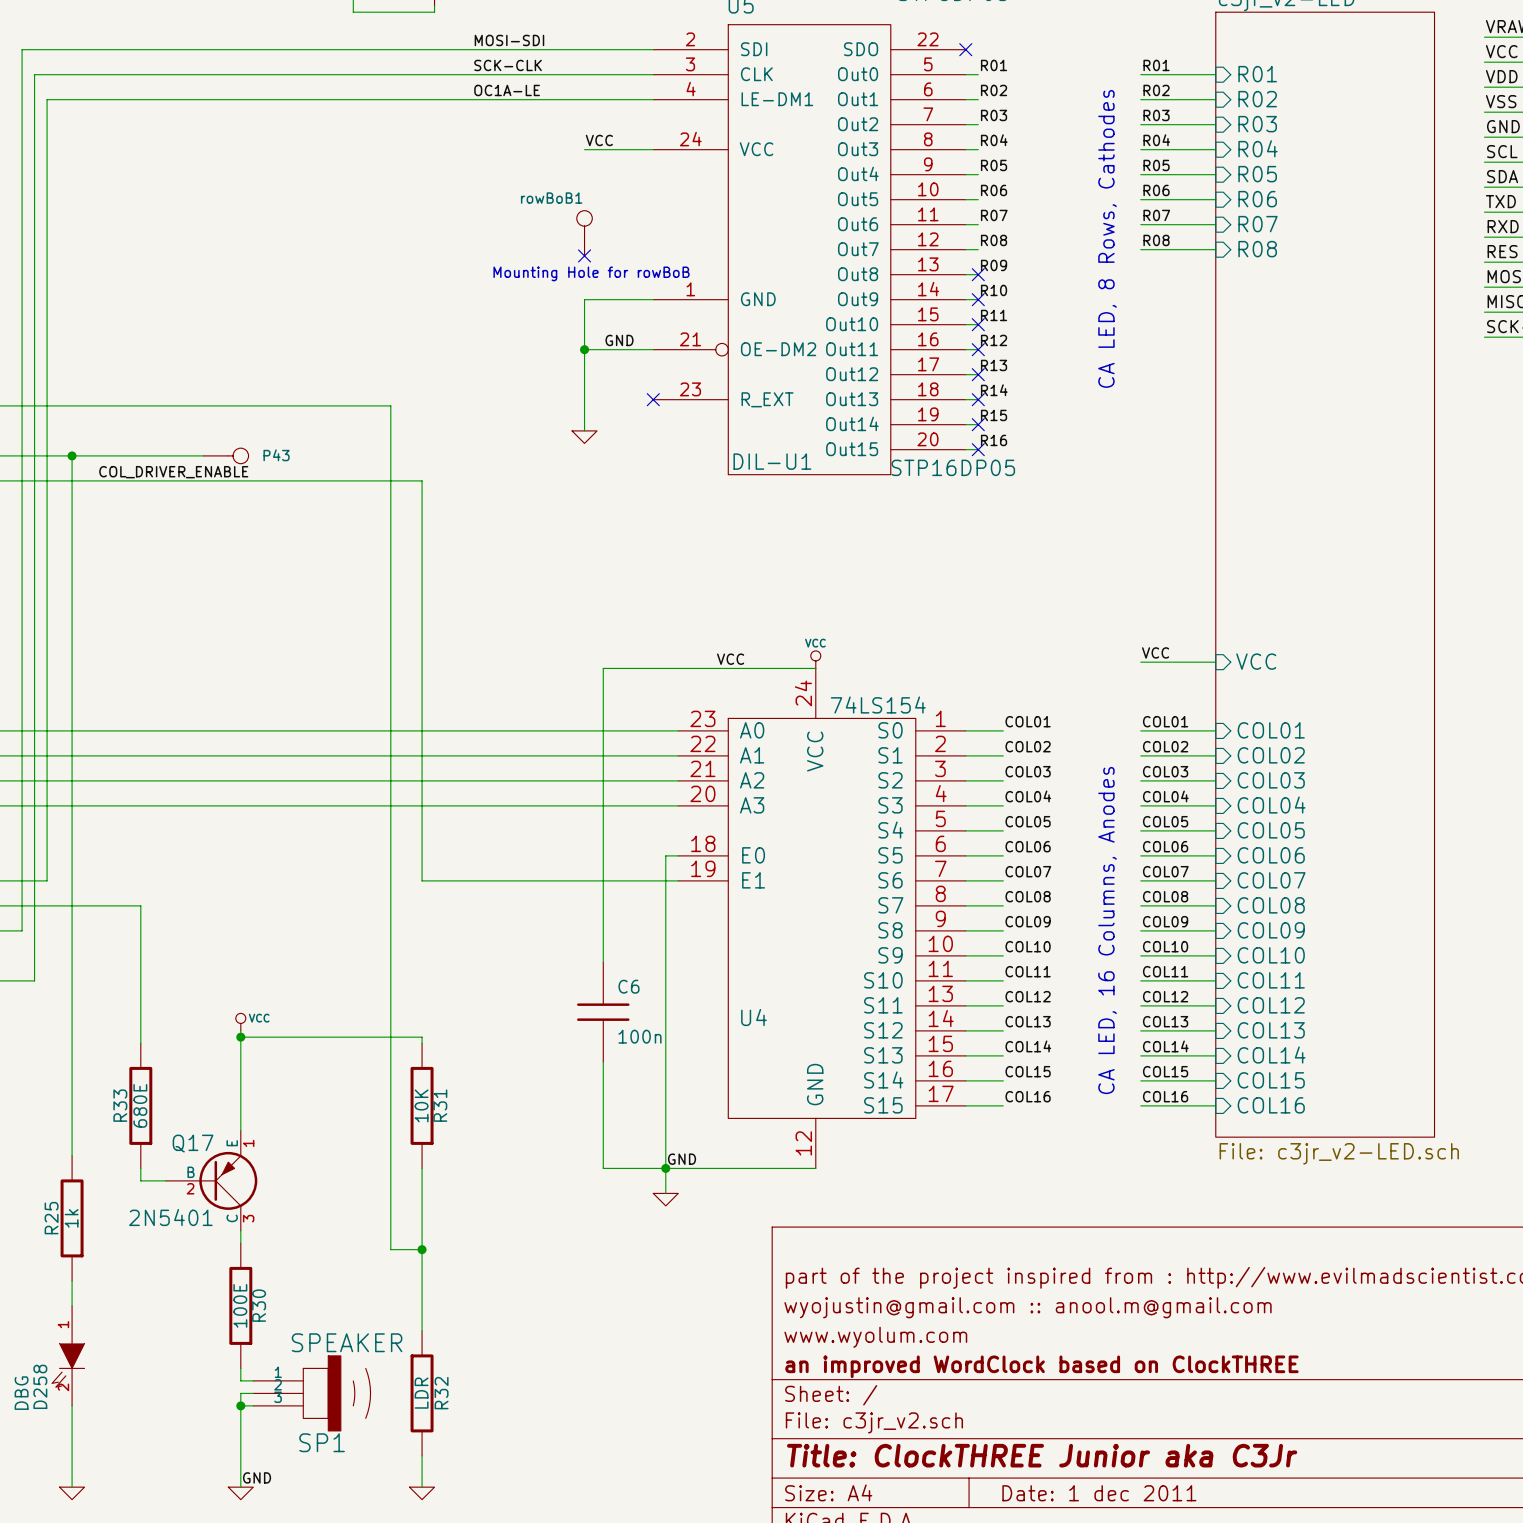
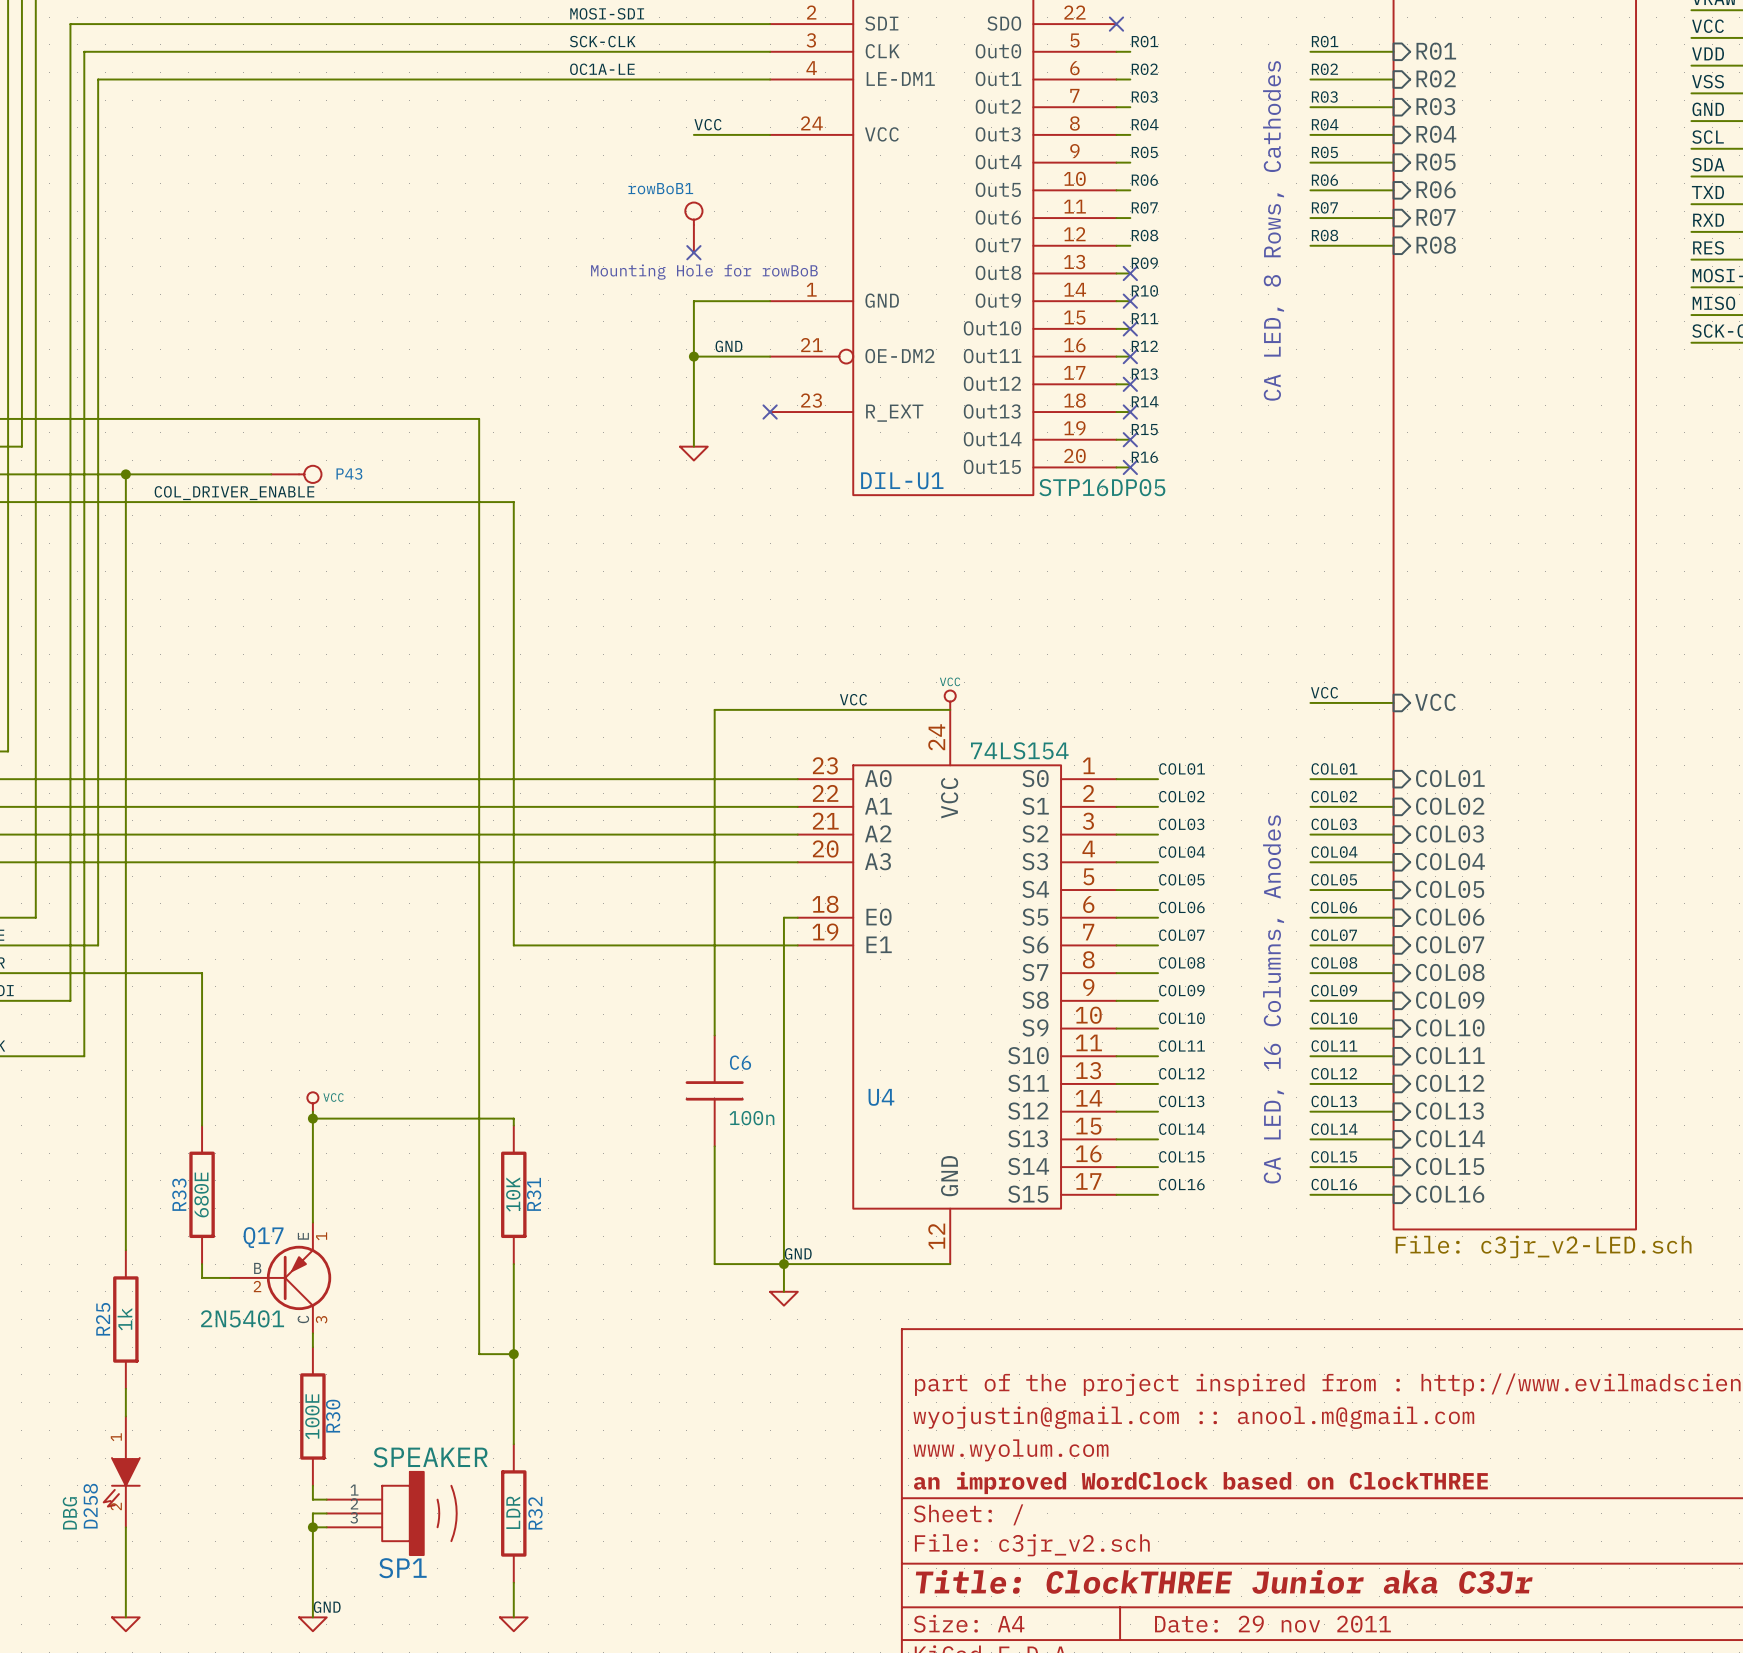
title block: Date: 1 dec 2011 (1099, 1493) -> Date: 29 nov 2011 (1272, 1624)

